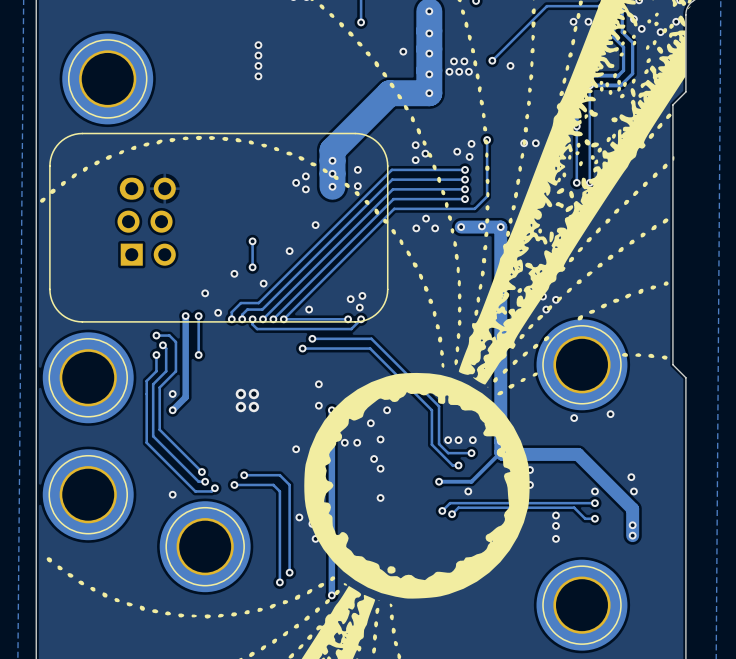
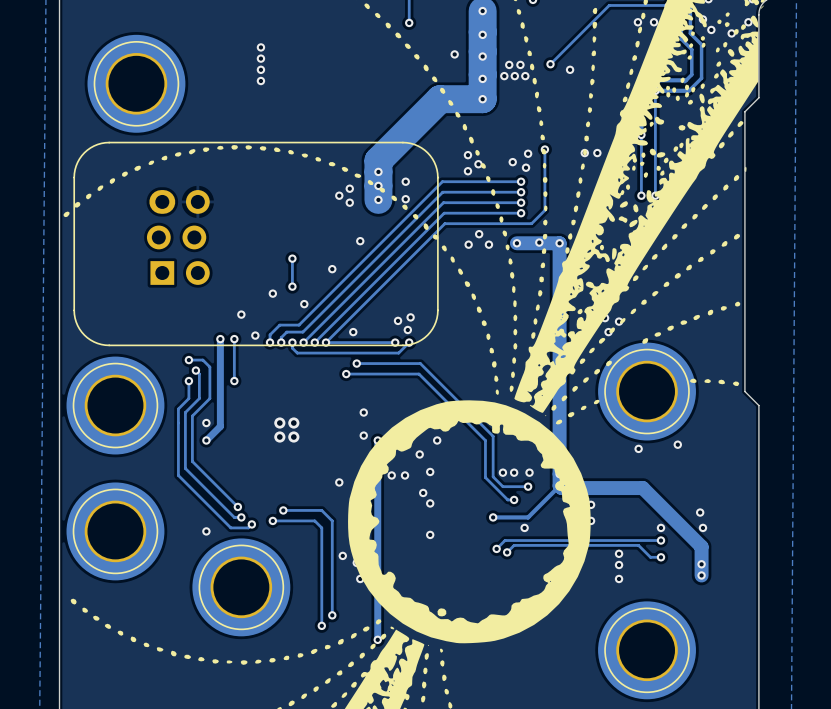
via: none -> (260, 47)
via: (258, 45) -> none
via: none -> (260, 58)
via: (258, 55) -> none
via: none -> (260, 69)
via: (258, 65) -> none
via: none -> (260, 81)
via: (258, 76) -> none

